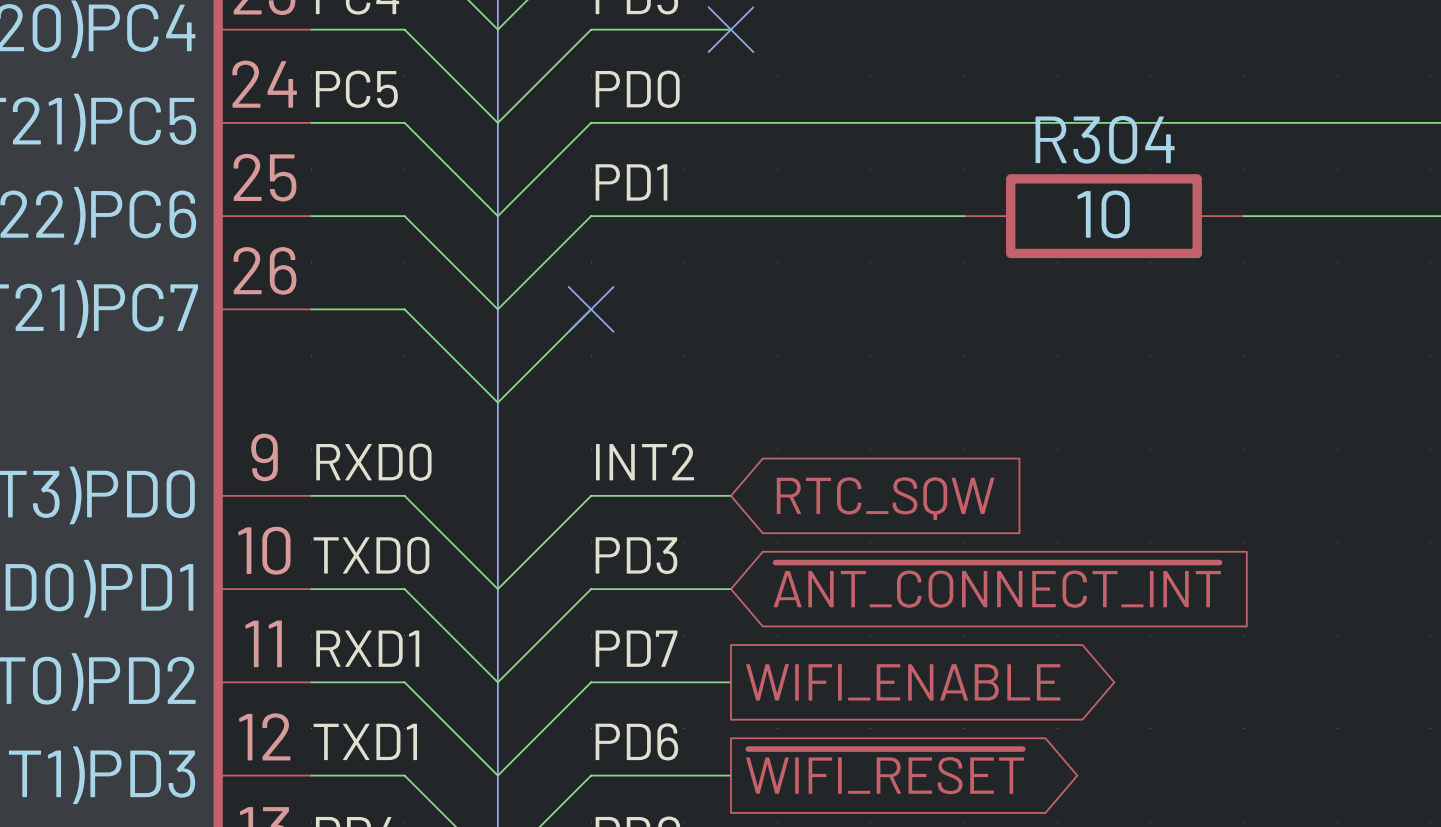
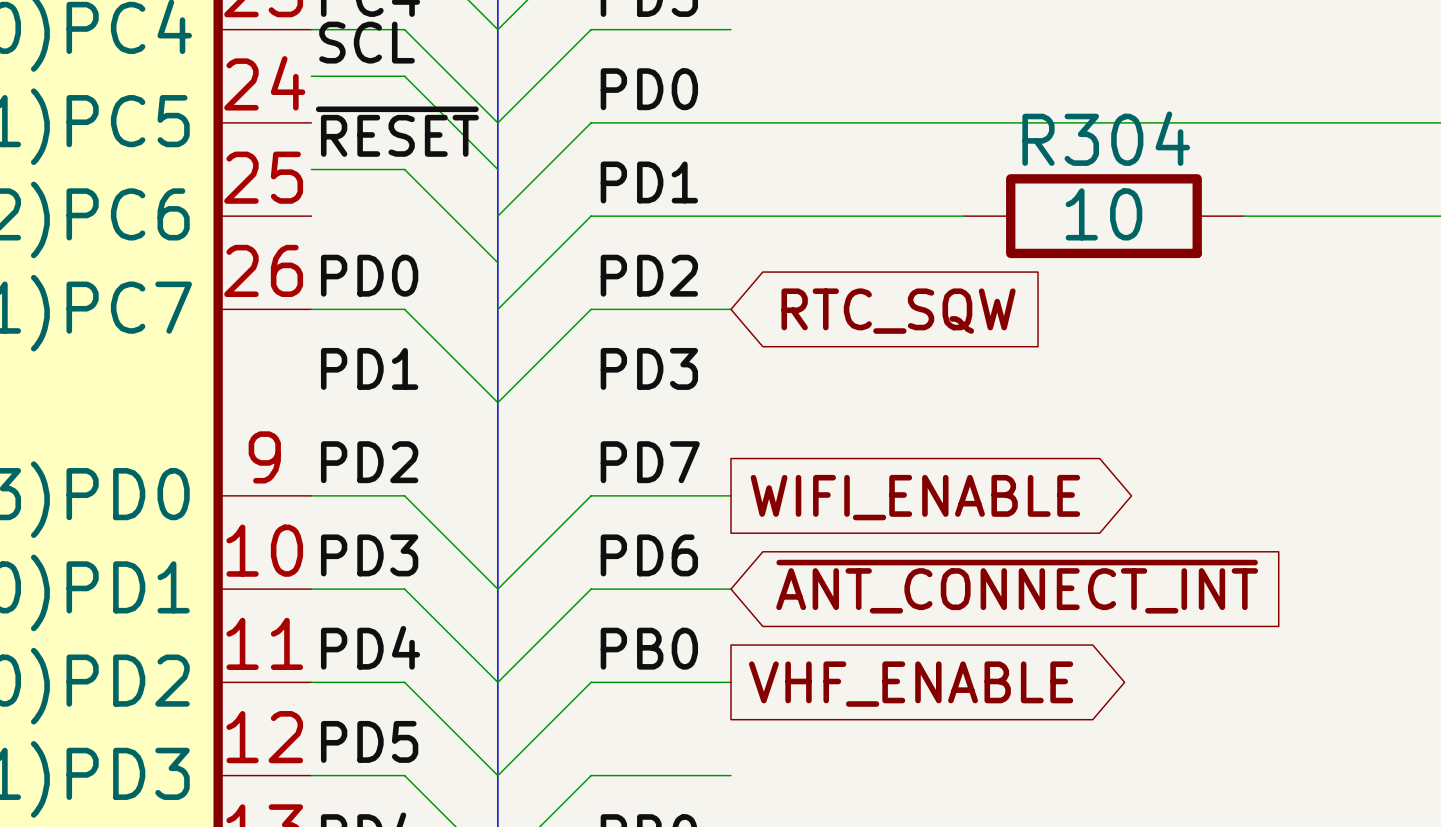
no-connect mark: (730, 29) -> none
label: none -> SCL (367, 42)
label: PC5 (356, 89) -> none
wire: (311, 122) (404, 122) (497, 216) -> (311, 76) (404, 76) (497, 169)
label: none -> ~{RESET} (397, 131)
wire: (311, 216) (404, 216) (497, 309) -> (311, 169) (404, 169) (497, 262)
label: none -> PD0 (369, 275)
label: none -> PD2 (649, 275)
wire: none -> (591, 309) (730, 309)
no-connect mark: (591, 309) -> none
global label: none -> RTC_SQW (898, 311)
label: none -> PD1 (369, 368)
label: none -> PD3 (649, 368)
label: INT2 (645, 461) -> PD7 (650, 462)
label: RXD0 (373, 462) -> PD2 (369, 462)
global label shape: input (885, 498) -> output (915, 497)
global label: RTC_SQW (885, 498) -> WIFI_ENABLE (915, 497)
label: TXD0 (371, 555) -> PD3 (369, 555)
label: PD3 (636, 555) -> PD6 (649, 555)
label: RXD1 (367, 648) -> PD4 (370, 647)
label: PD7 (636, 648) -> PB0 (649, 648)
global label: WIFI_ENABLE (903, 682) -> VHF_ENABLE (911, 684)
label: TXD1 (365, 741) -> PD5 (369, 741)
label: PD6 (636, 741) -> none
global label: ~{WIFI_RESET} (885, 771) -> none

